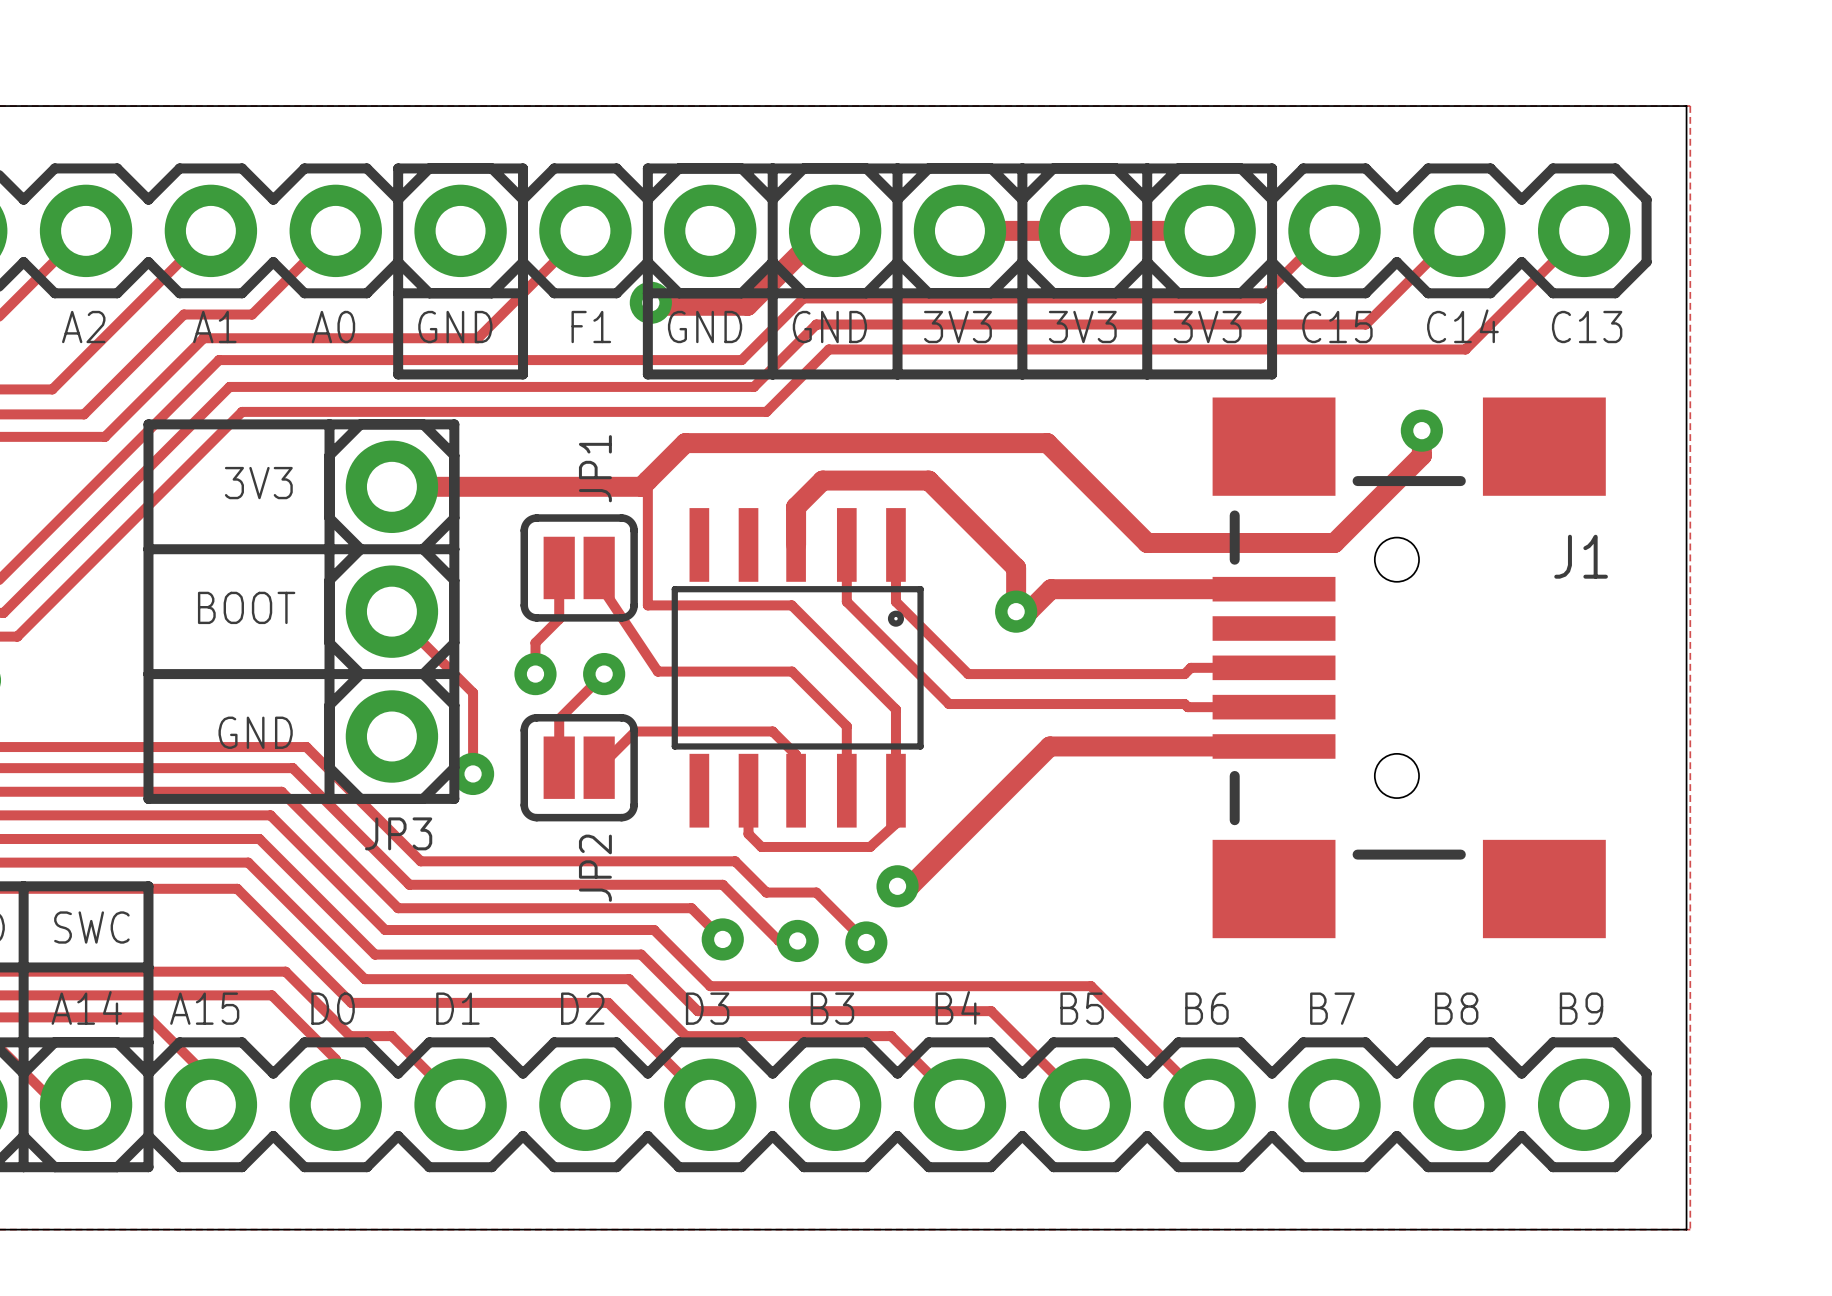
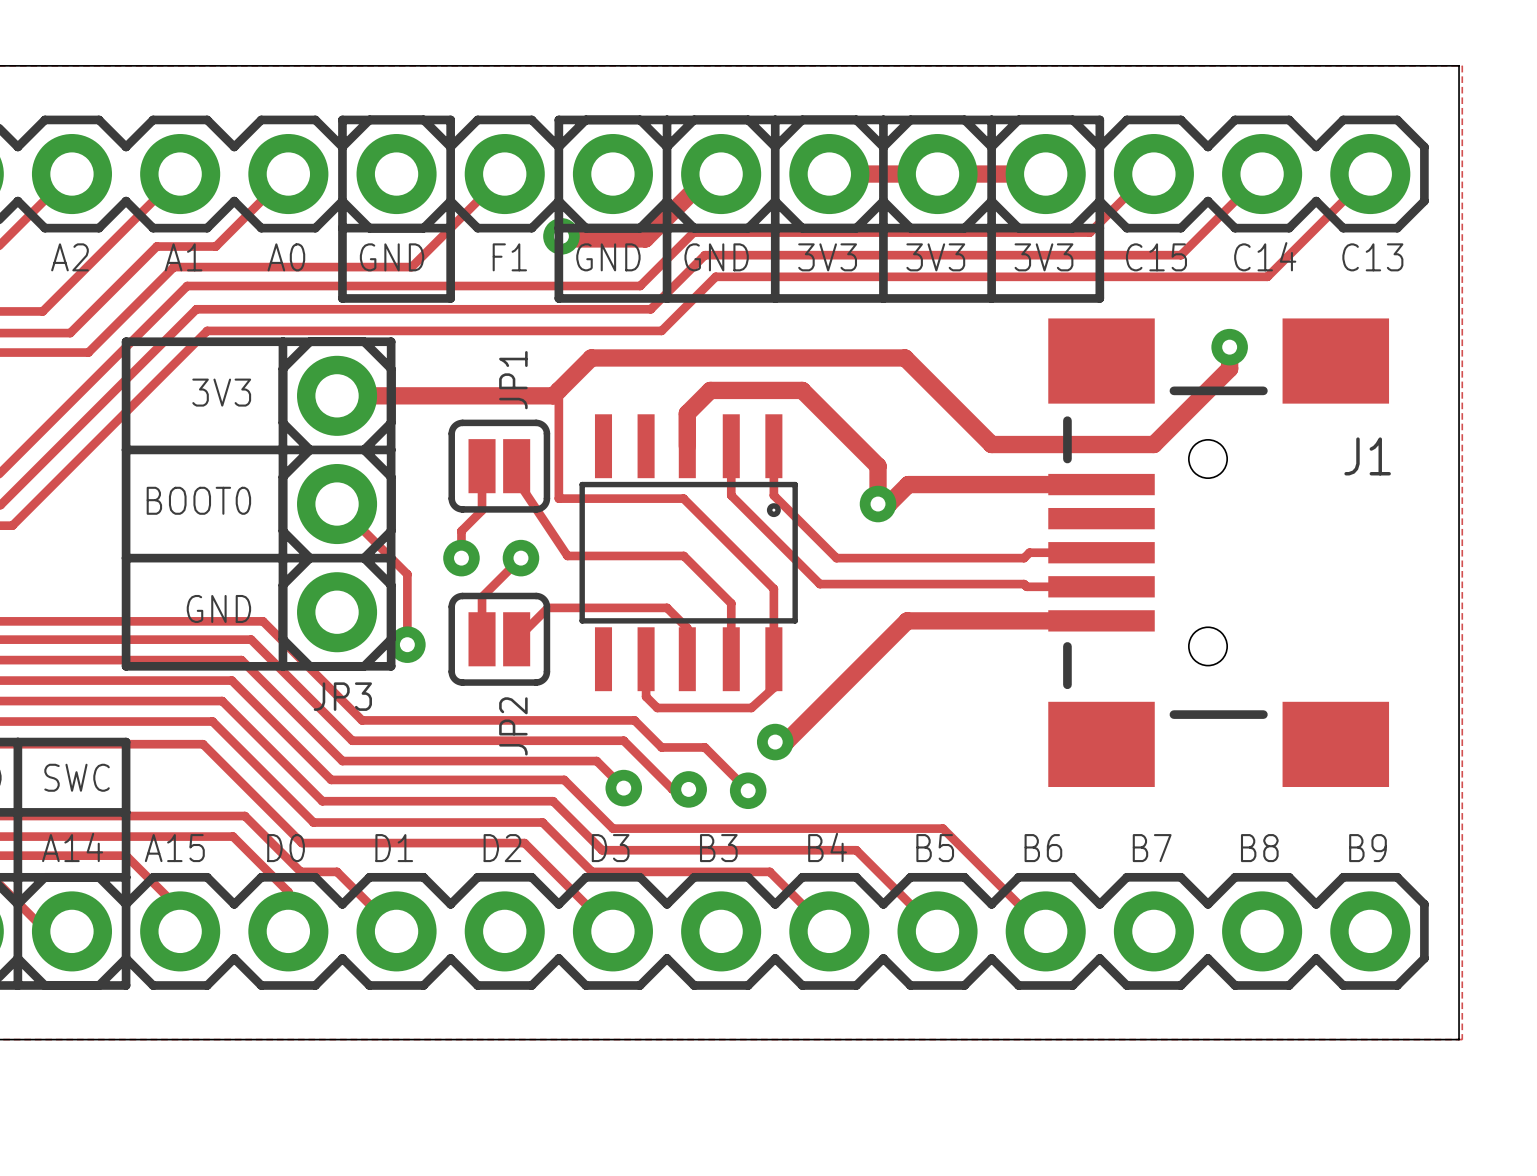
text: BOOT (246, 607) -> BOOT0 (198, 500)

